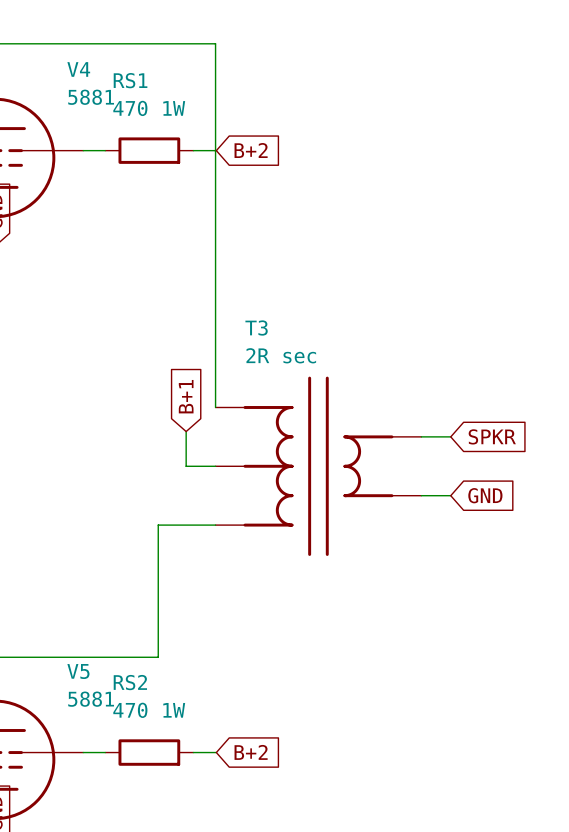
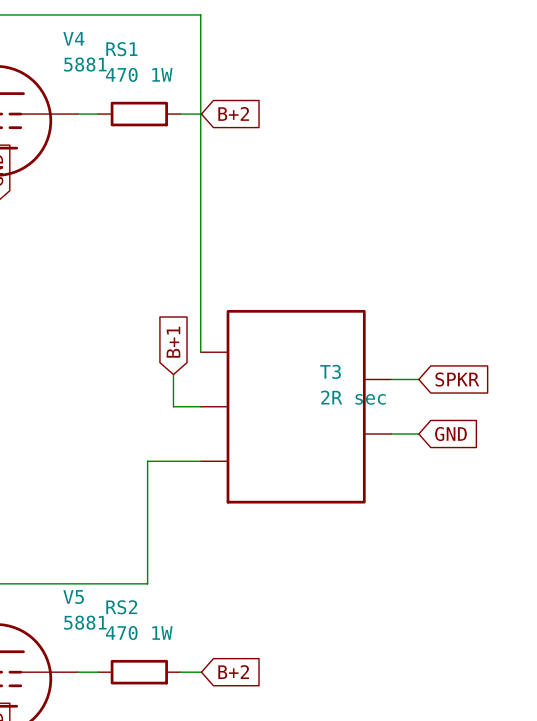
T3 name position: T3 (256, 328) -> T3 (330, 371)
T3 value position: 2R sec (281, 355) -> 2R sec (353, 397)
T3 symbol: [215, 376, 422, 556] -> [200, 309, 392, 504]

